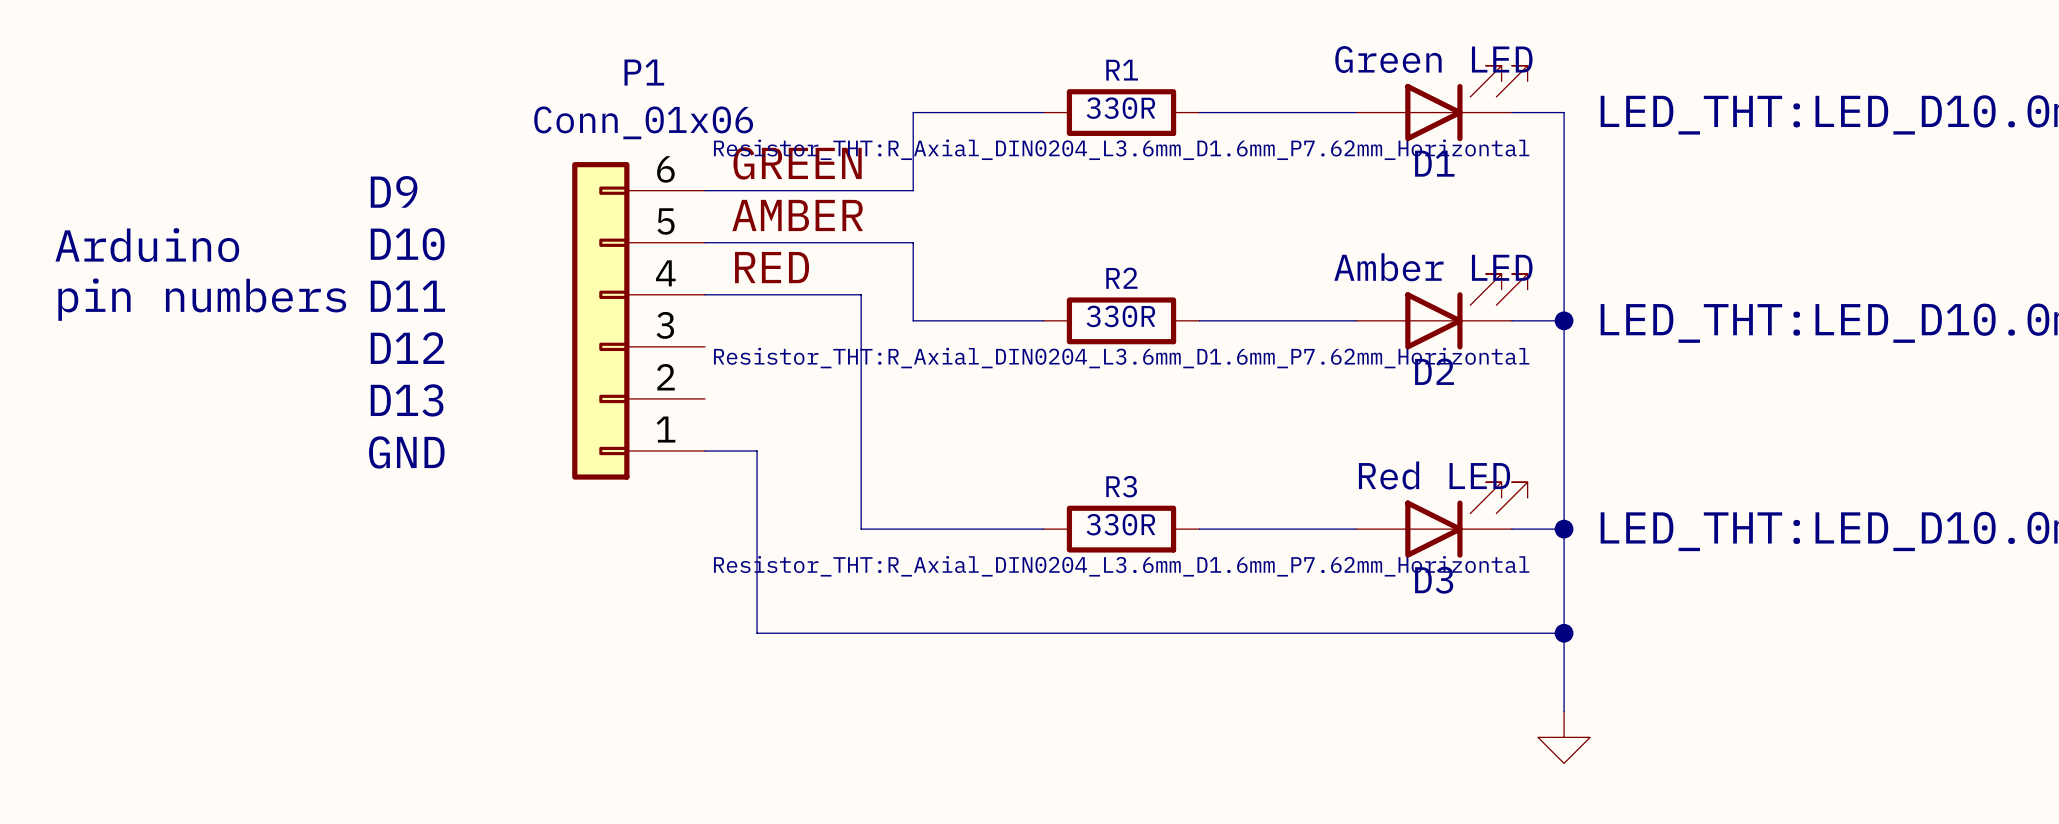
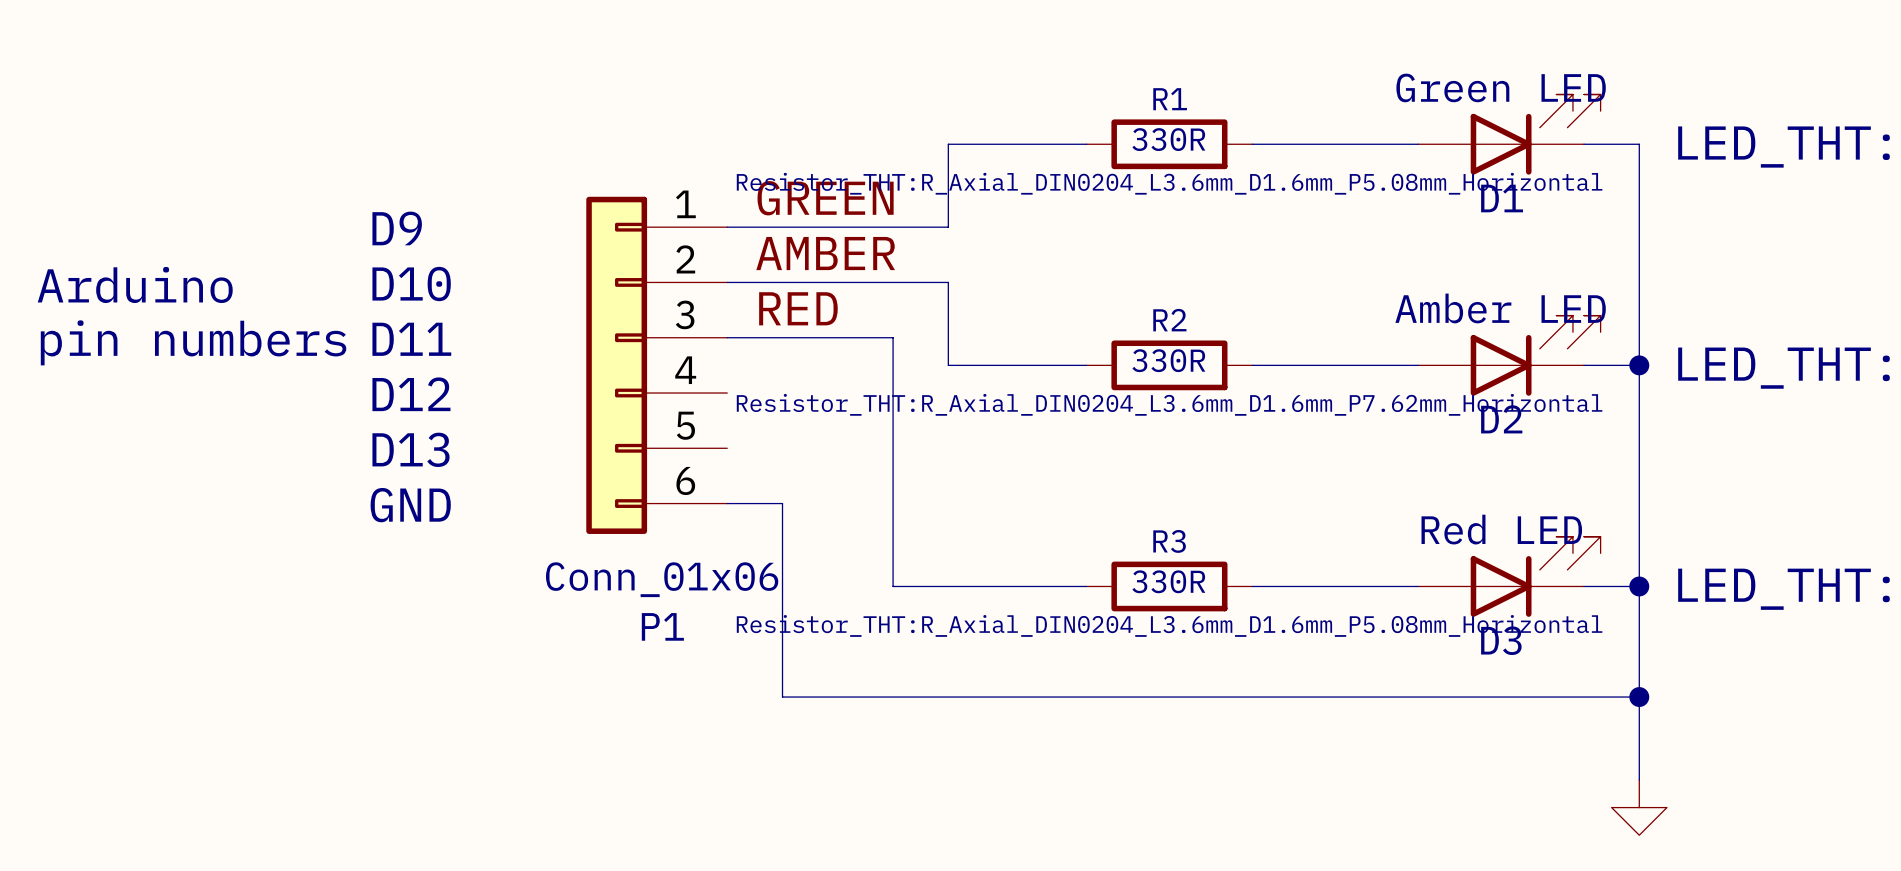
R1 text: Resistor_THT:R_Axial_DIN0204_L3.6mm_D1.6mm_P7.62mm_Horizontal (1121, 149) -> Resistor_THT:R_Axial_DIN0204_L3.6mm_D1.6mm_P5.08mm_Horizontal (1169, 183)
P1 flip: as is (600, 320) -> up-down (616, 365)
R3 text: Resistor_THT:R_Axial_DIN0204_L3.6mm_D1.6mm_P7.62mm_Horizontal (1121, 566) -> Resistor_THT:R_Axial_DIN0204_L3.6mm_D1.6mm_P5.08mm_Horizontal (1169, 625)

